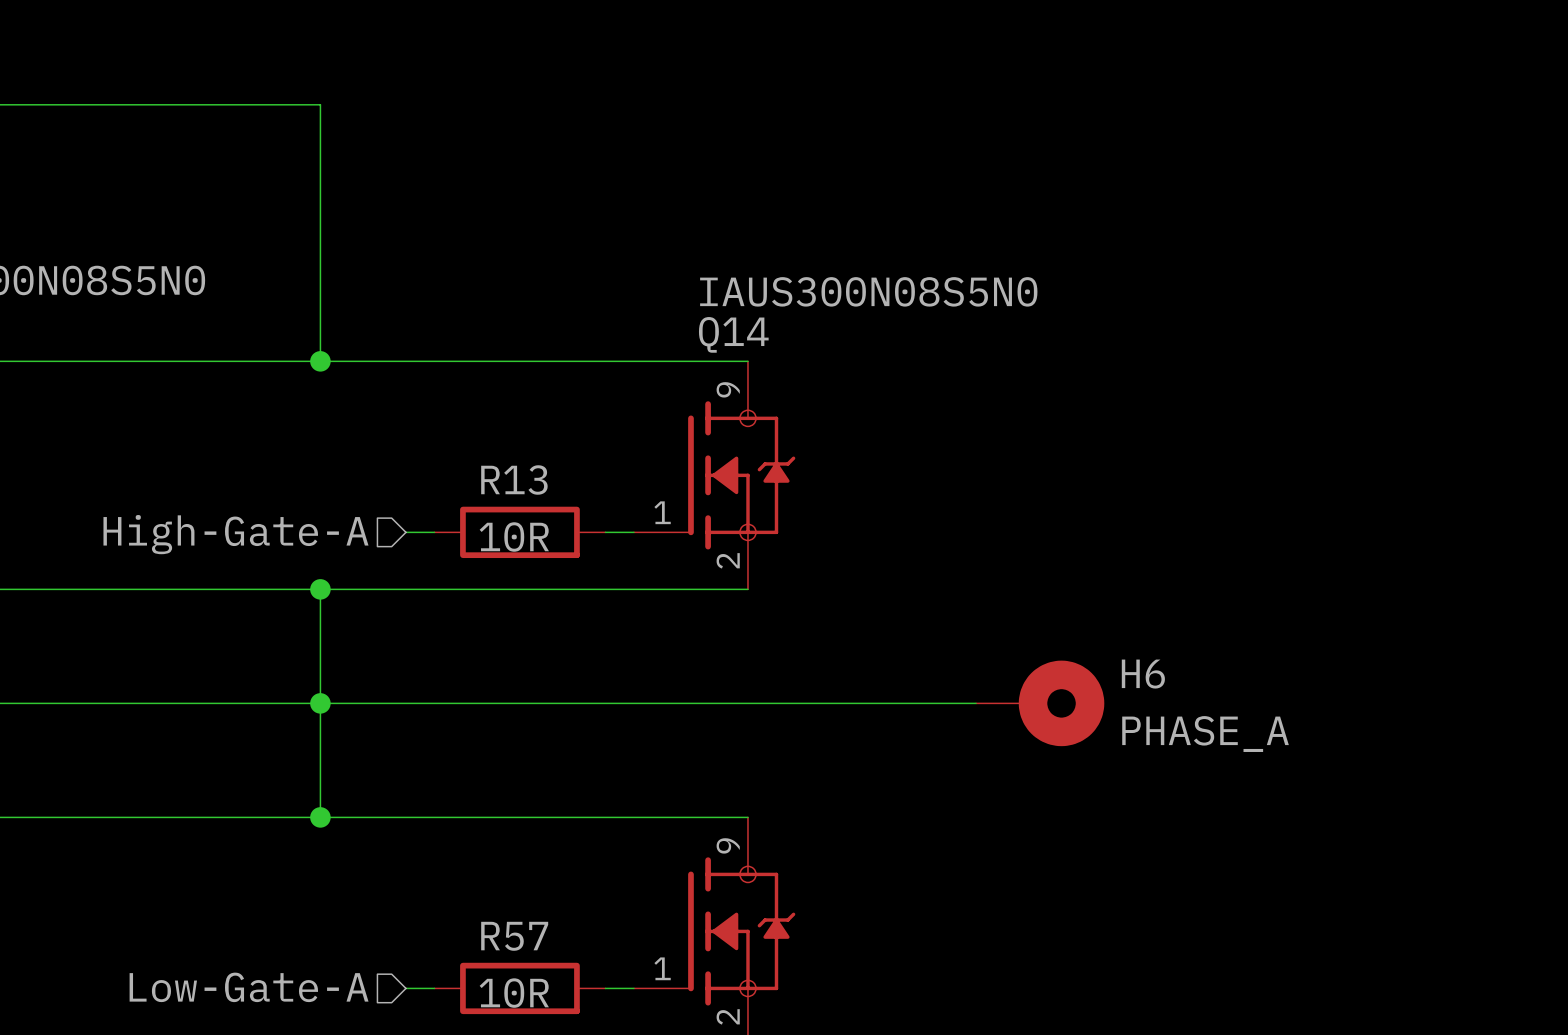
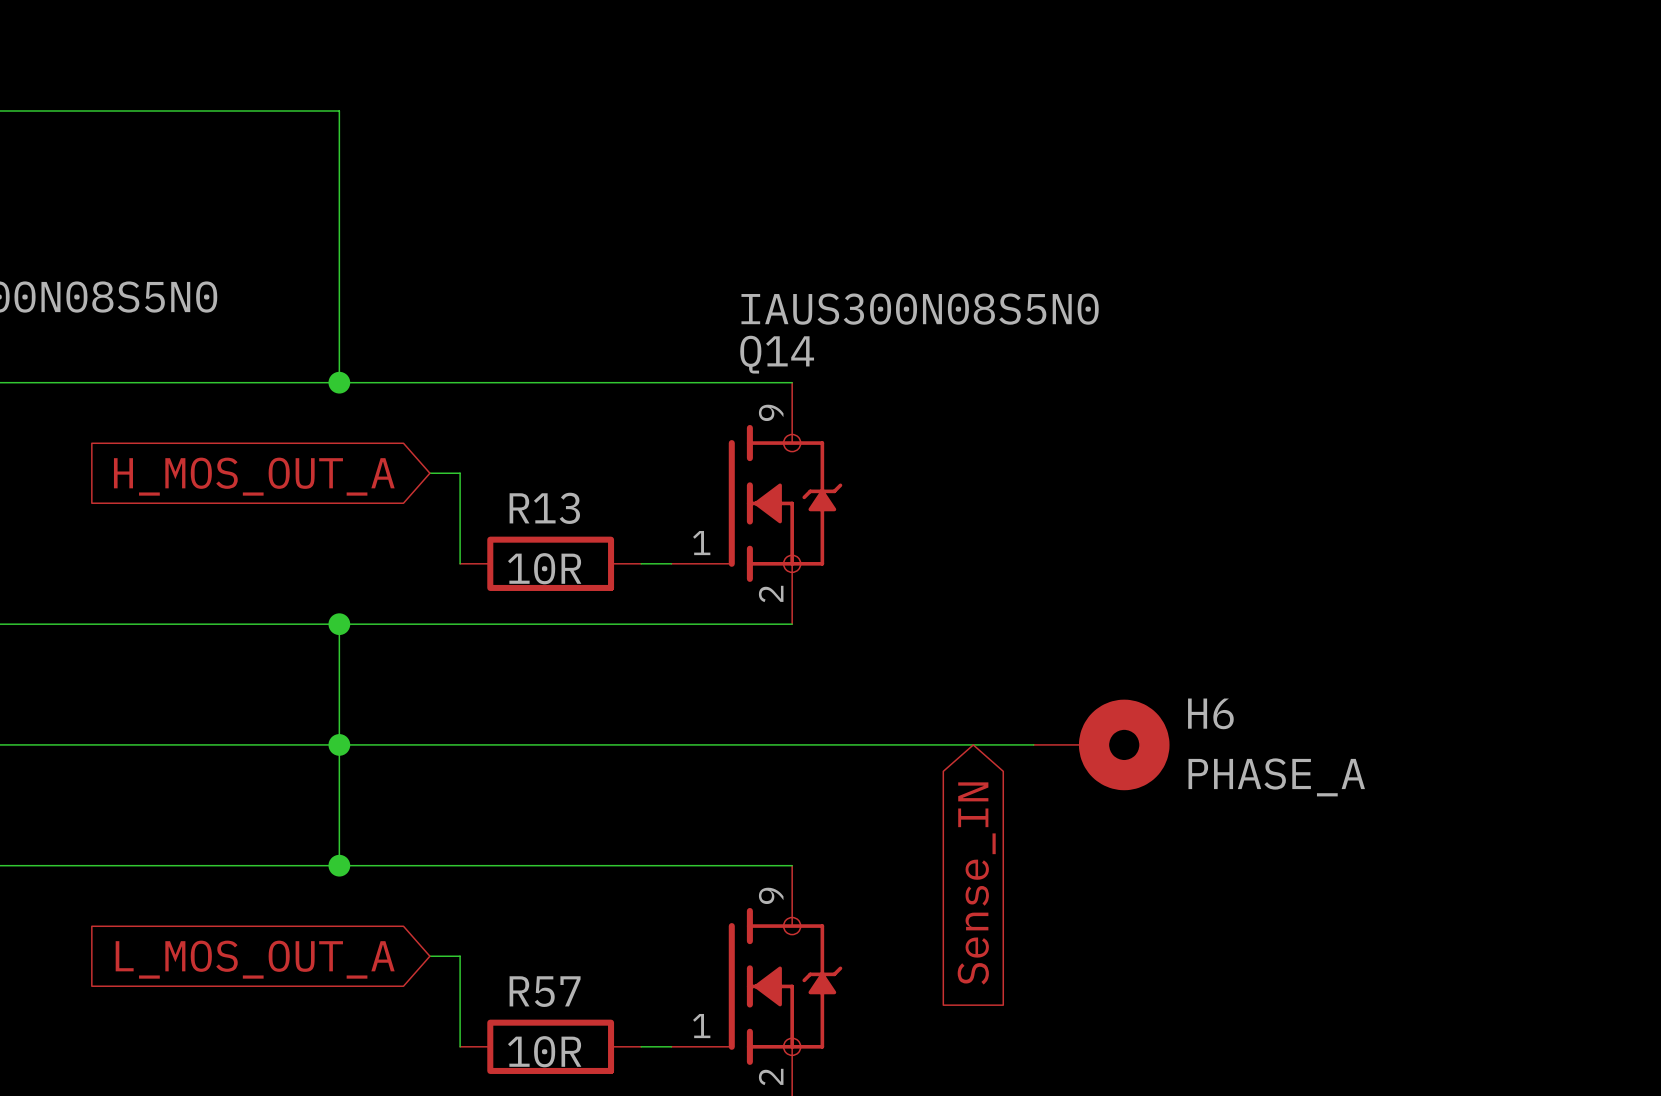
global label: none -> H_MOS_OUT_A (254, 476)
wire: (405, 532) (434, 532) -> (429, 473) (460, 473) (460, 563)
hierarchical label: High-Gate-A (235, 534) -> none
global label: none -> Sense_IN (976, 883)
global label: none -> L_MOS_OUT_A (255, 959)
hierarchical label: Low-Gate-A (249, 987) -> none
wire: (405, 988) (434, 988) -> (429, 956) (460, 956) (460, 1046)

